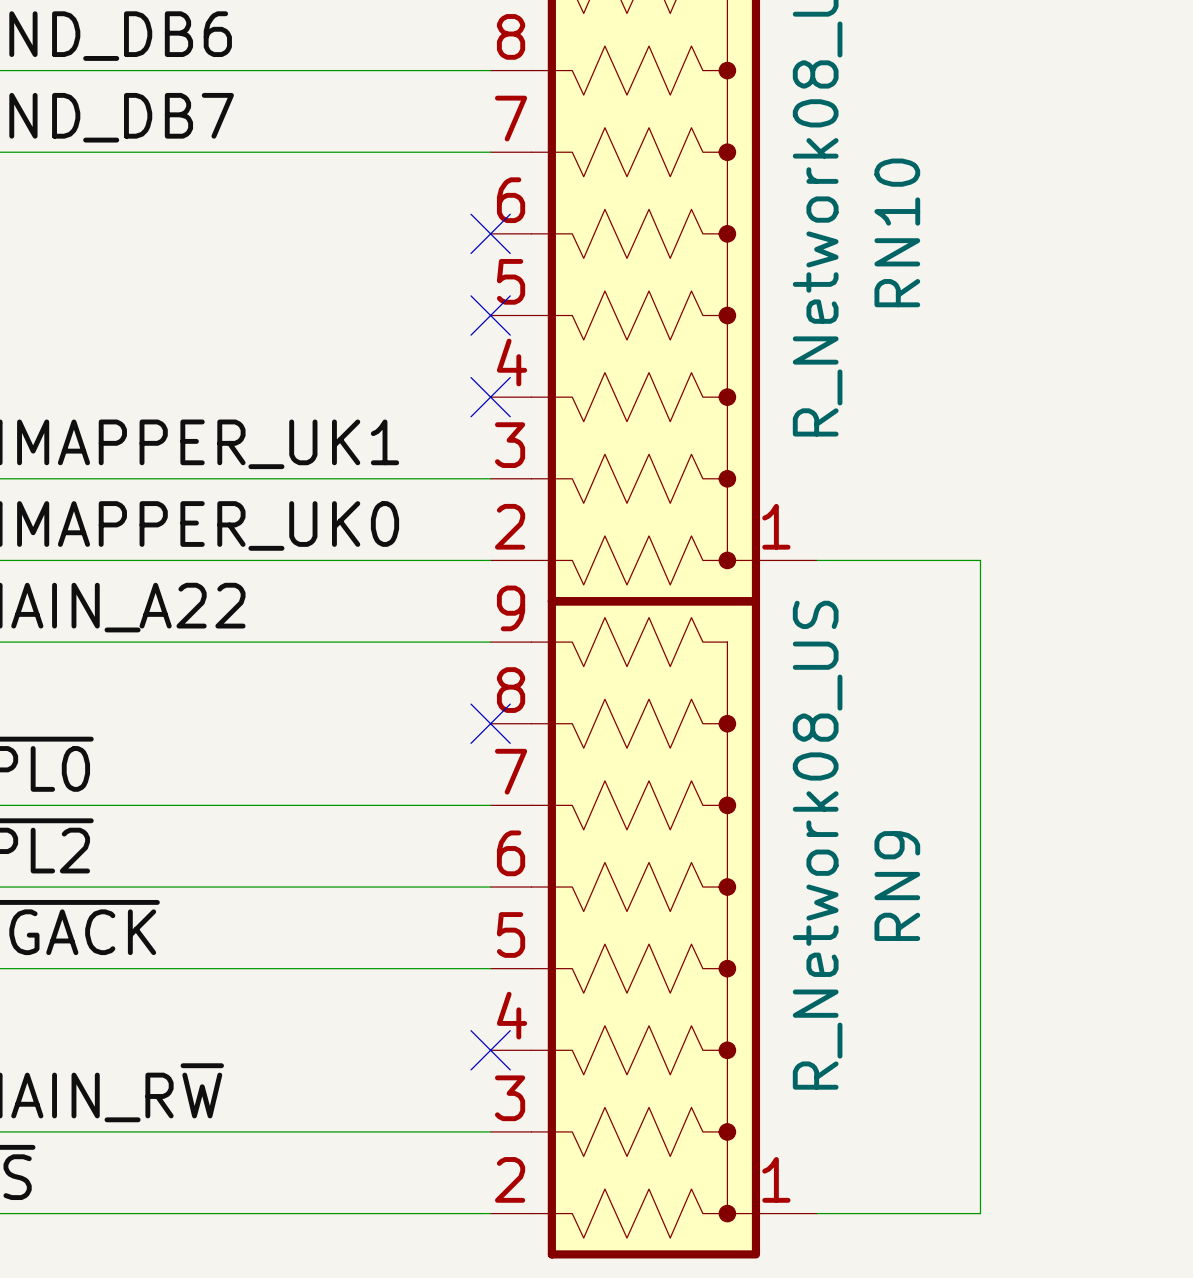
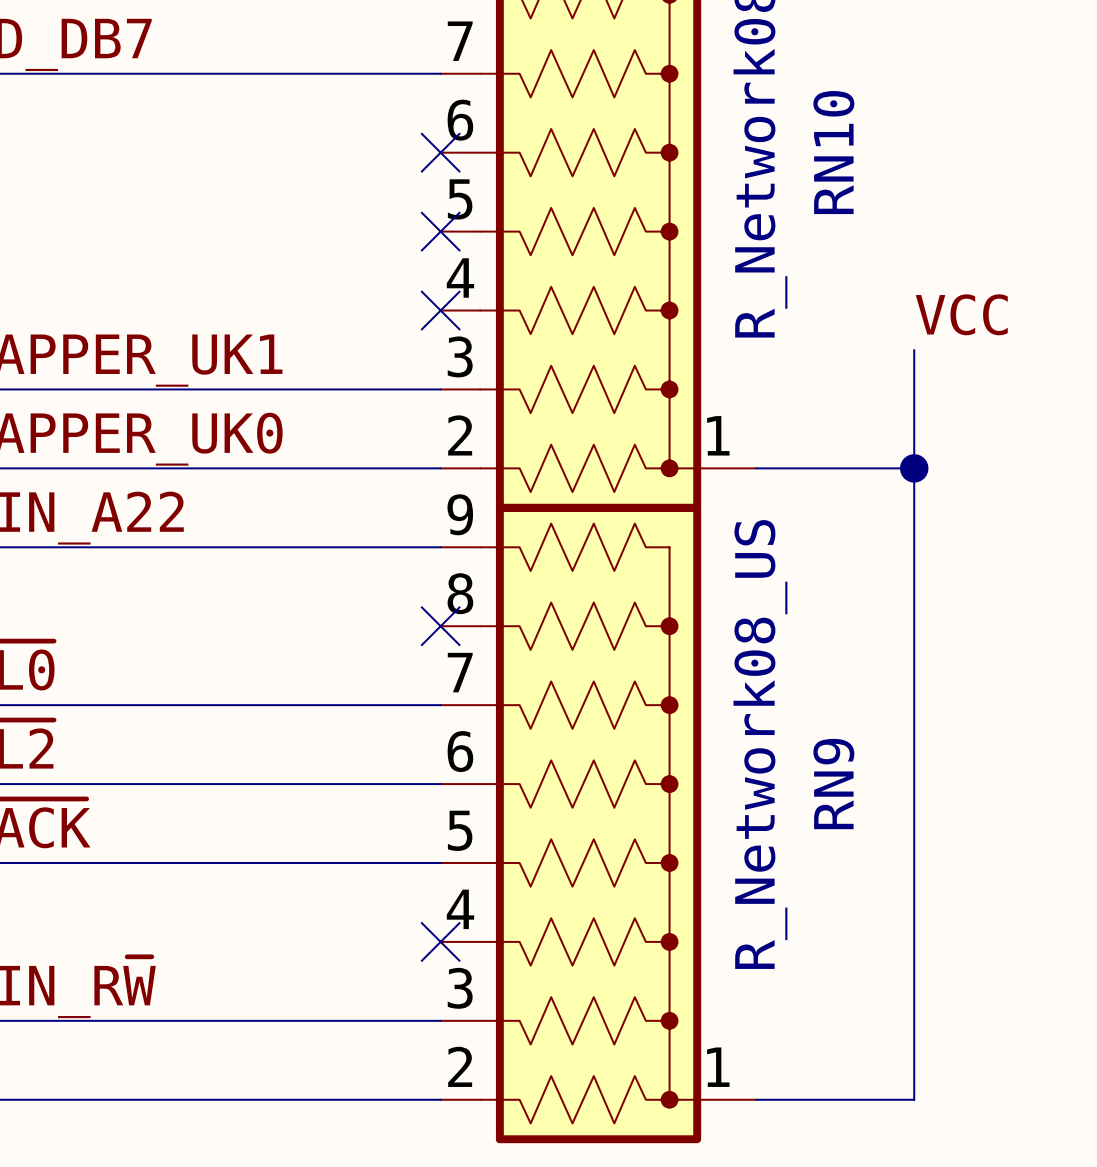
label: none -> VCC (961, 314)
wire: none -> (914, 349) (914, 468)
junction: none -> (914, 468)

